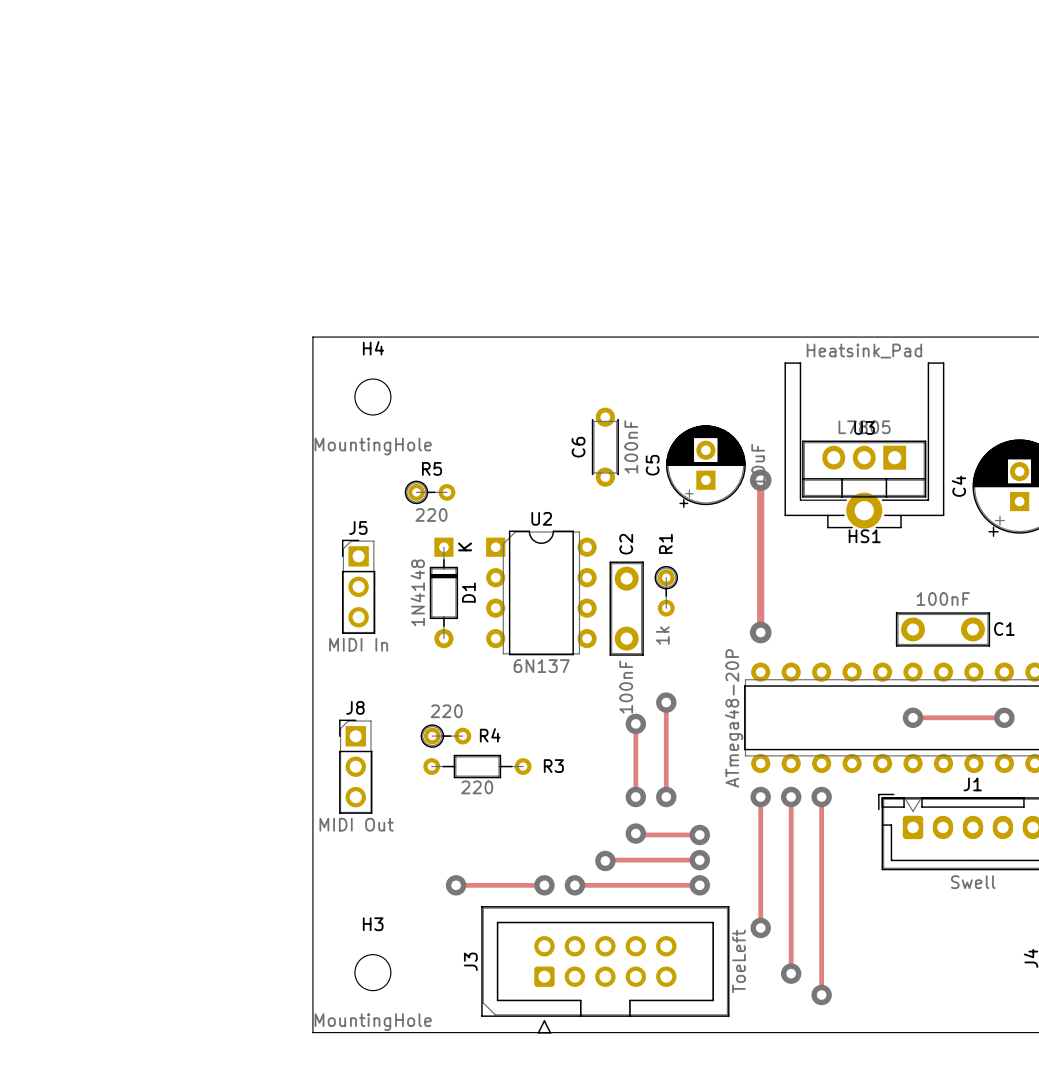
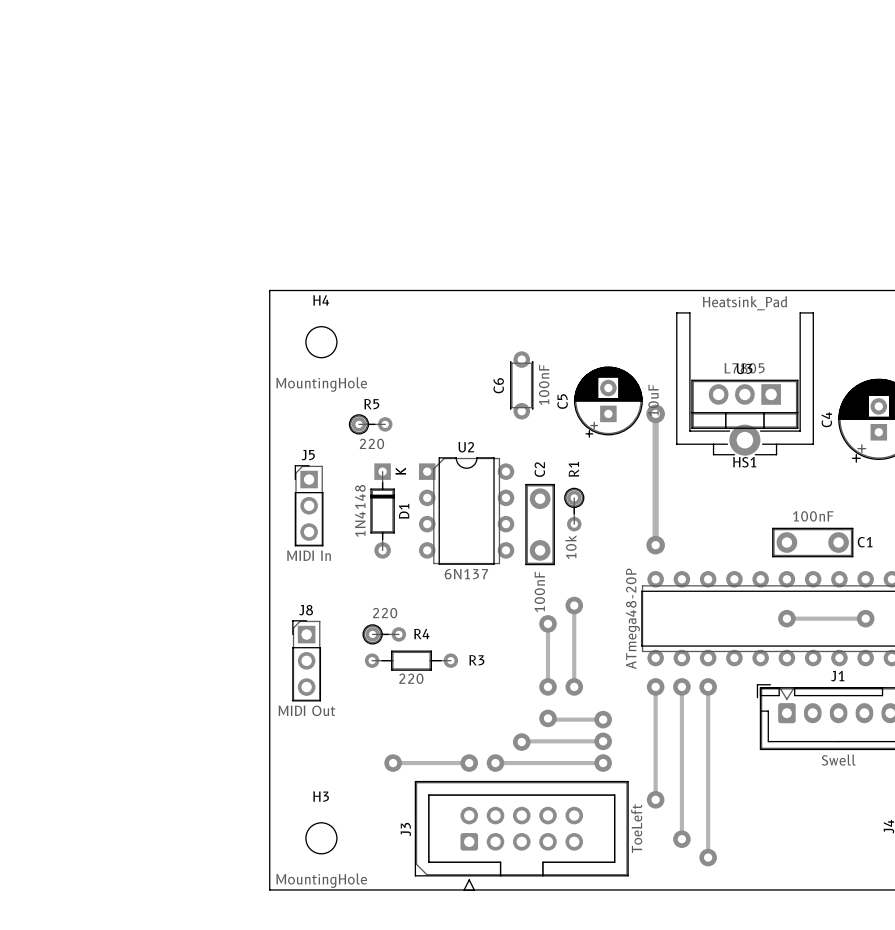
R1 value: 1k (662, 635) -> 10k (570, 547)

